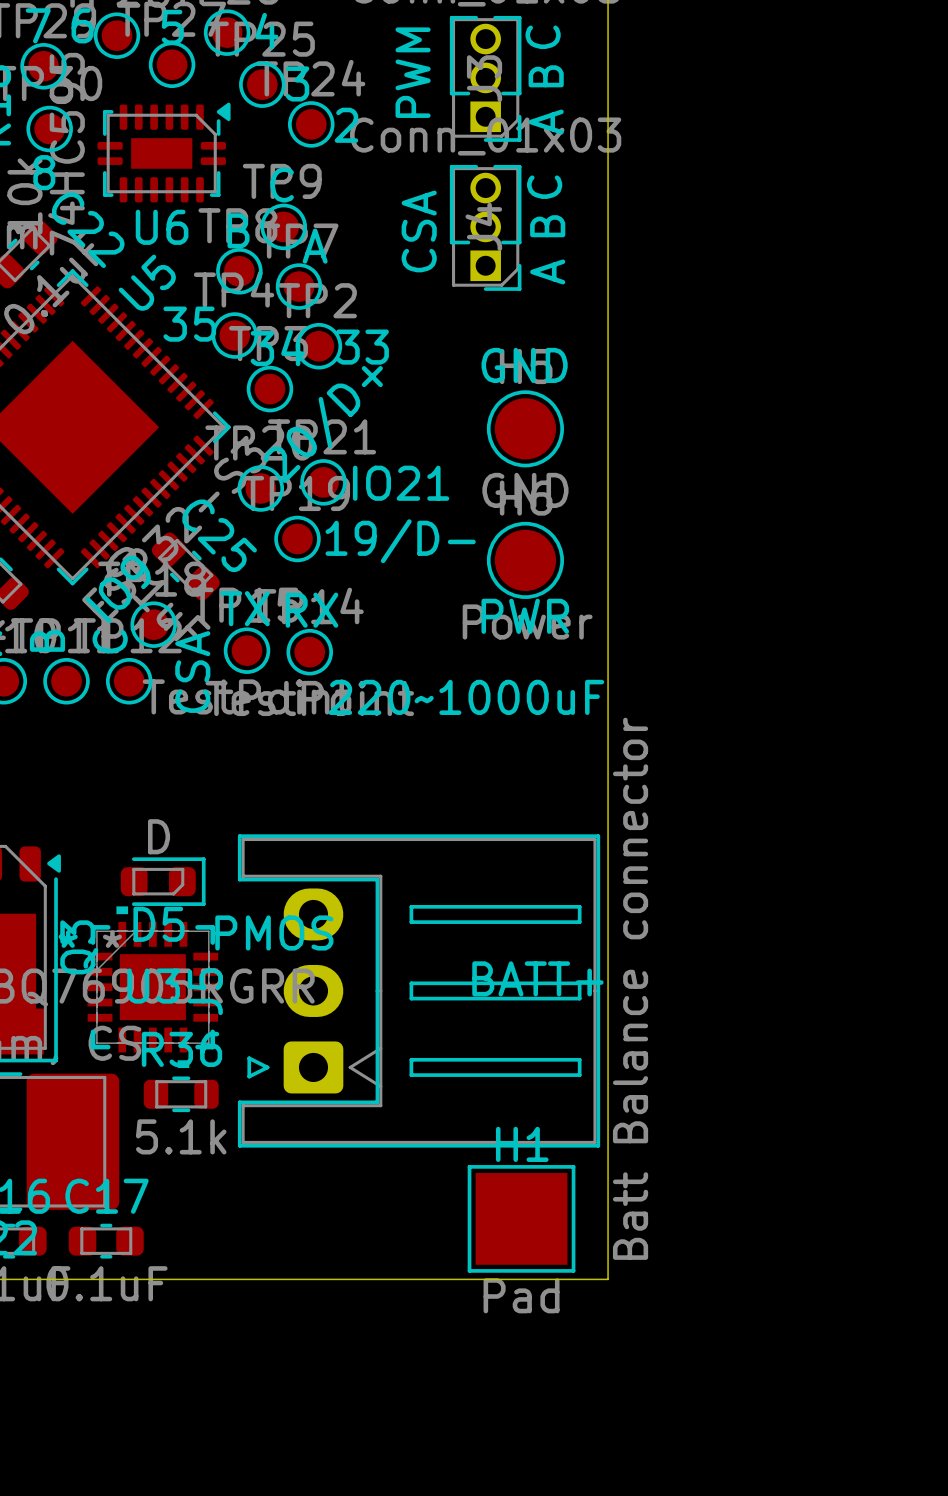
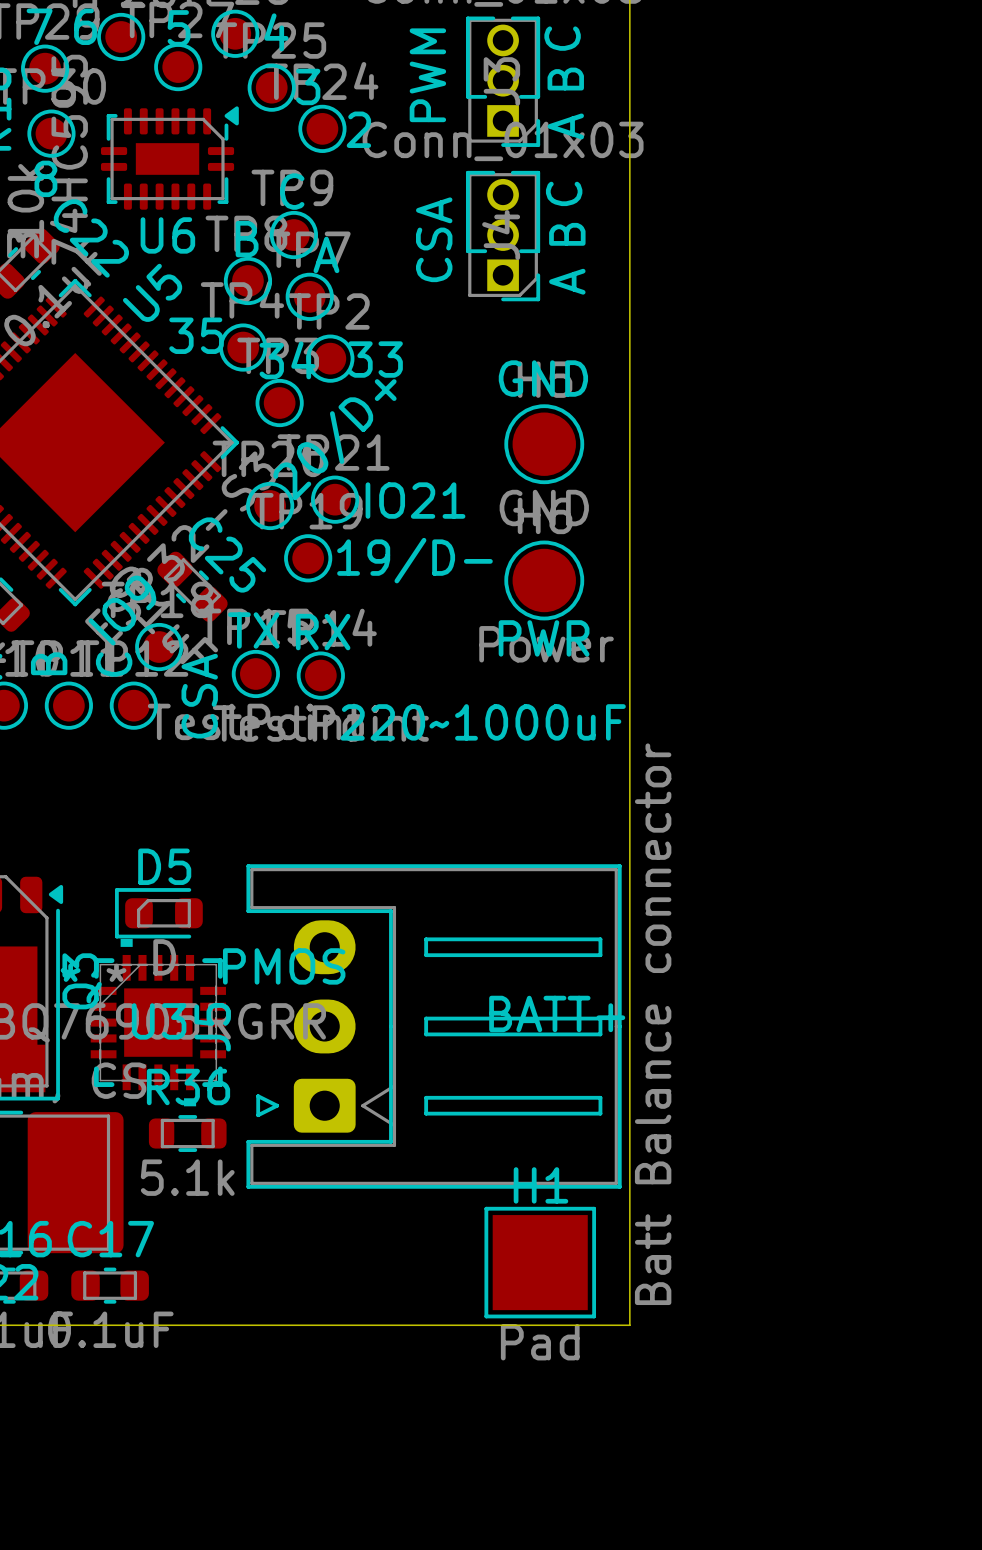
D5 rotation: 0° (163, 881) -> 180° (158, 913)

